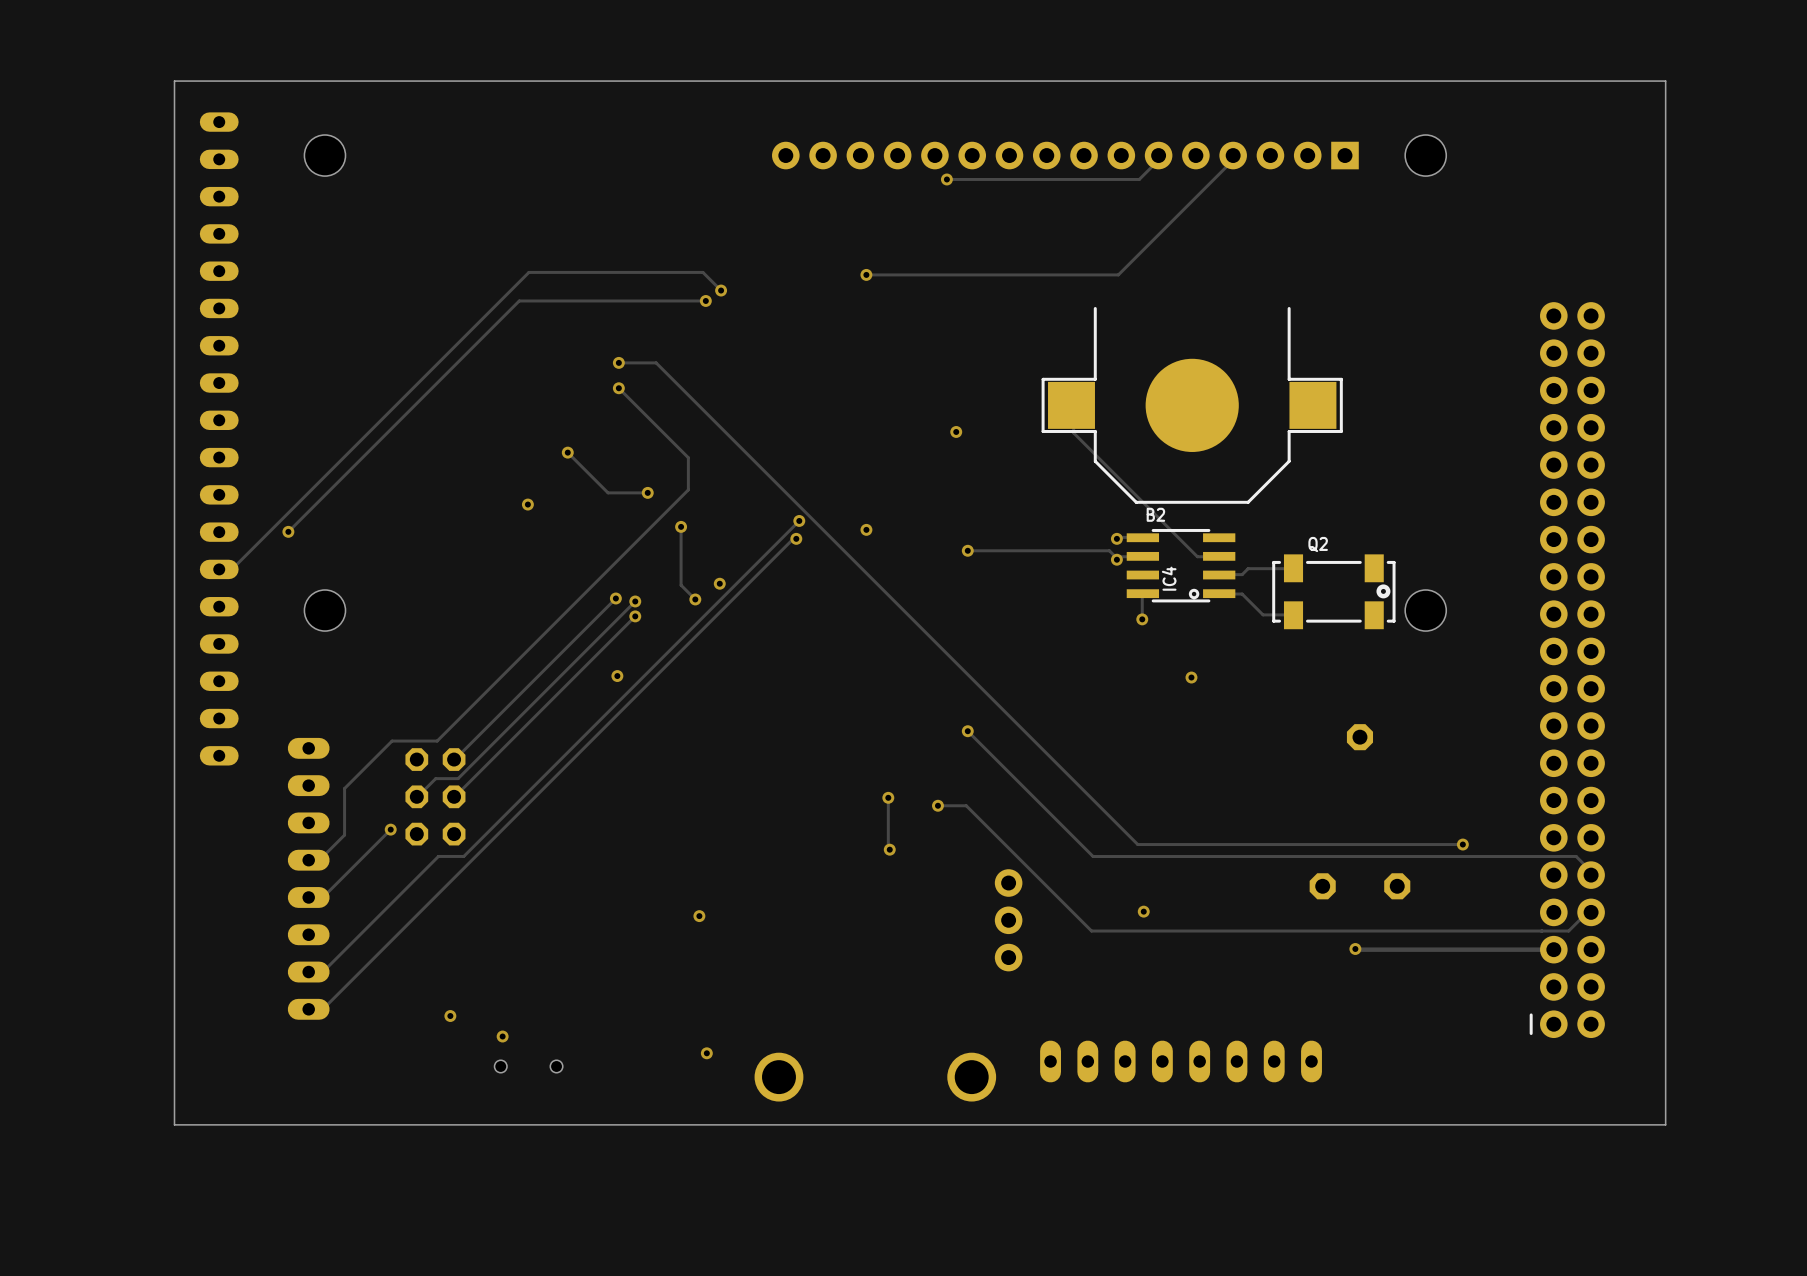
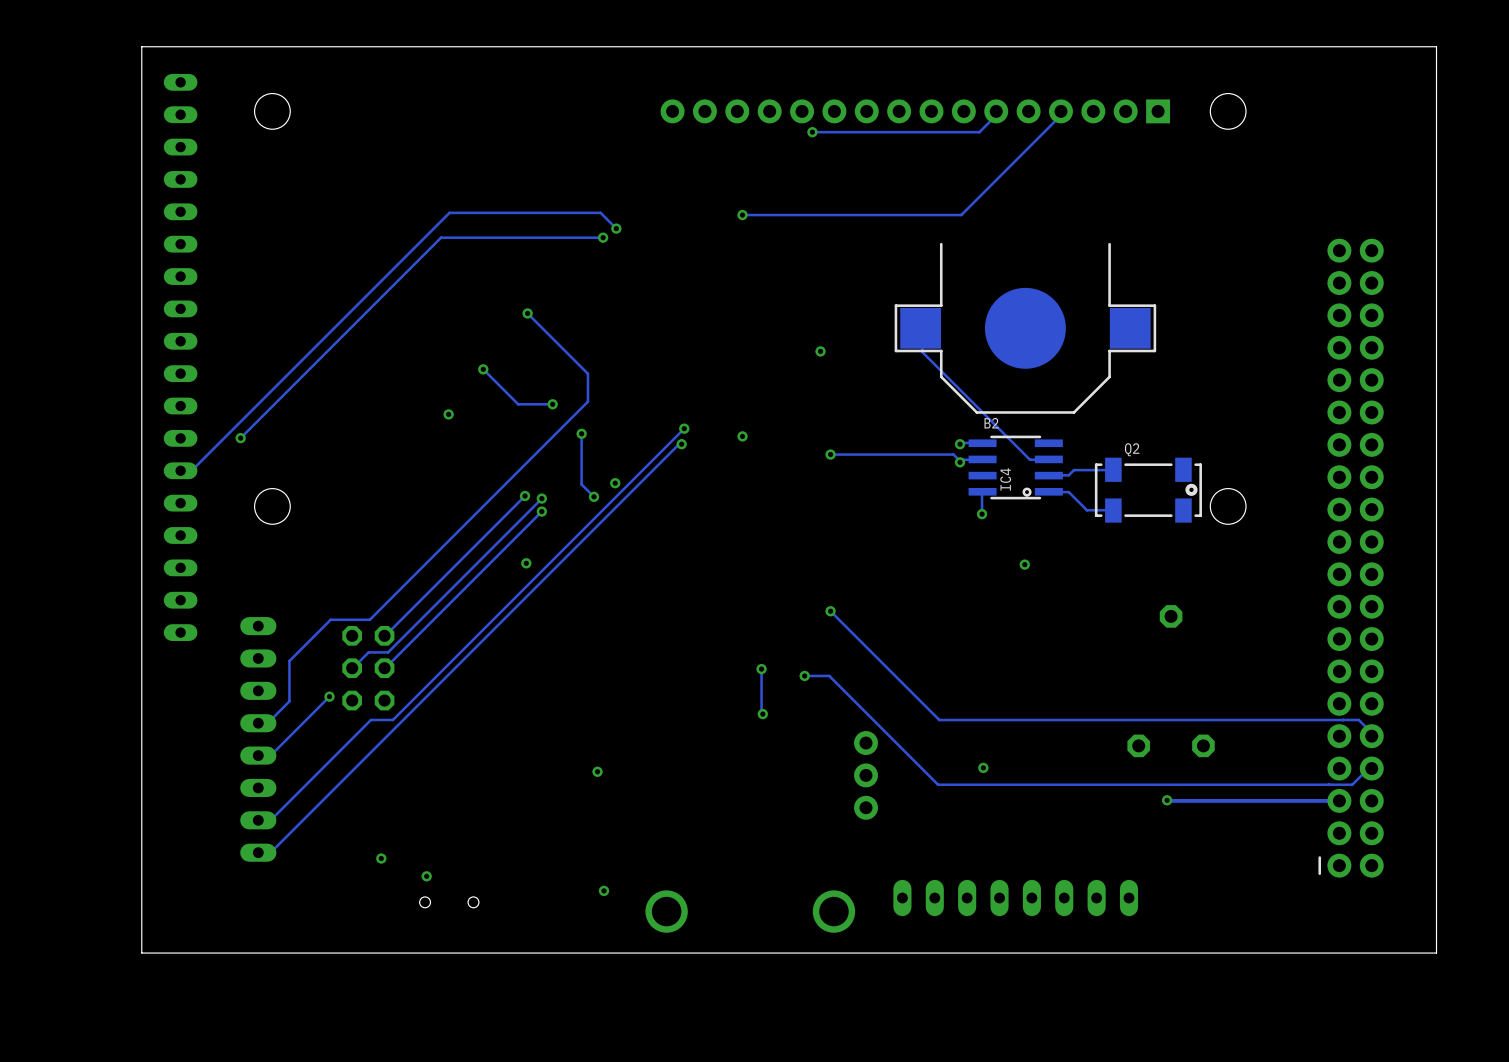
track: (618, 362) (656, 362) (1137, 844) (1462, 844) -> none
via: (618, 362) -> none
via: (1462, 844) -> none

